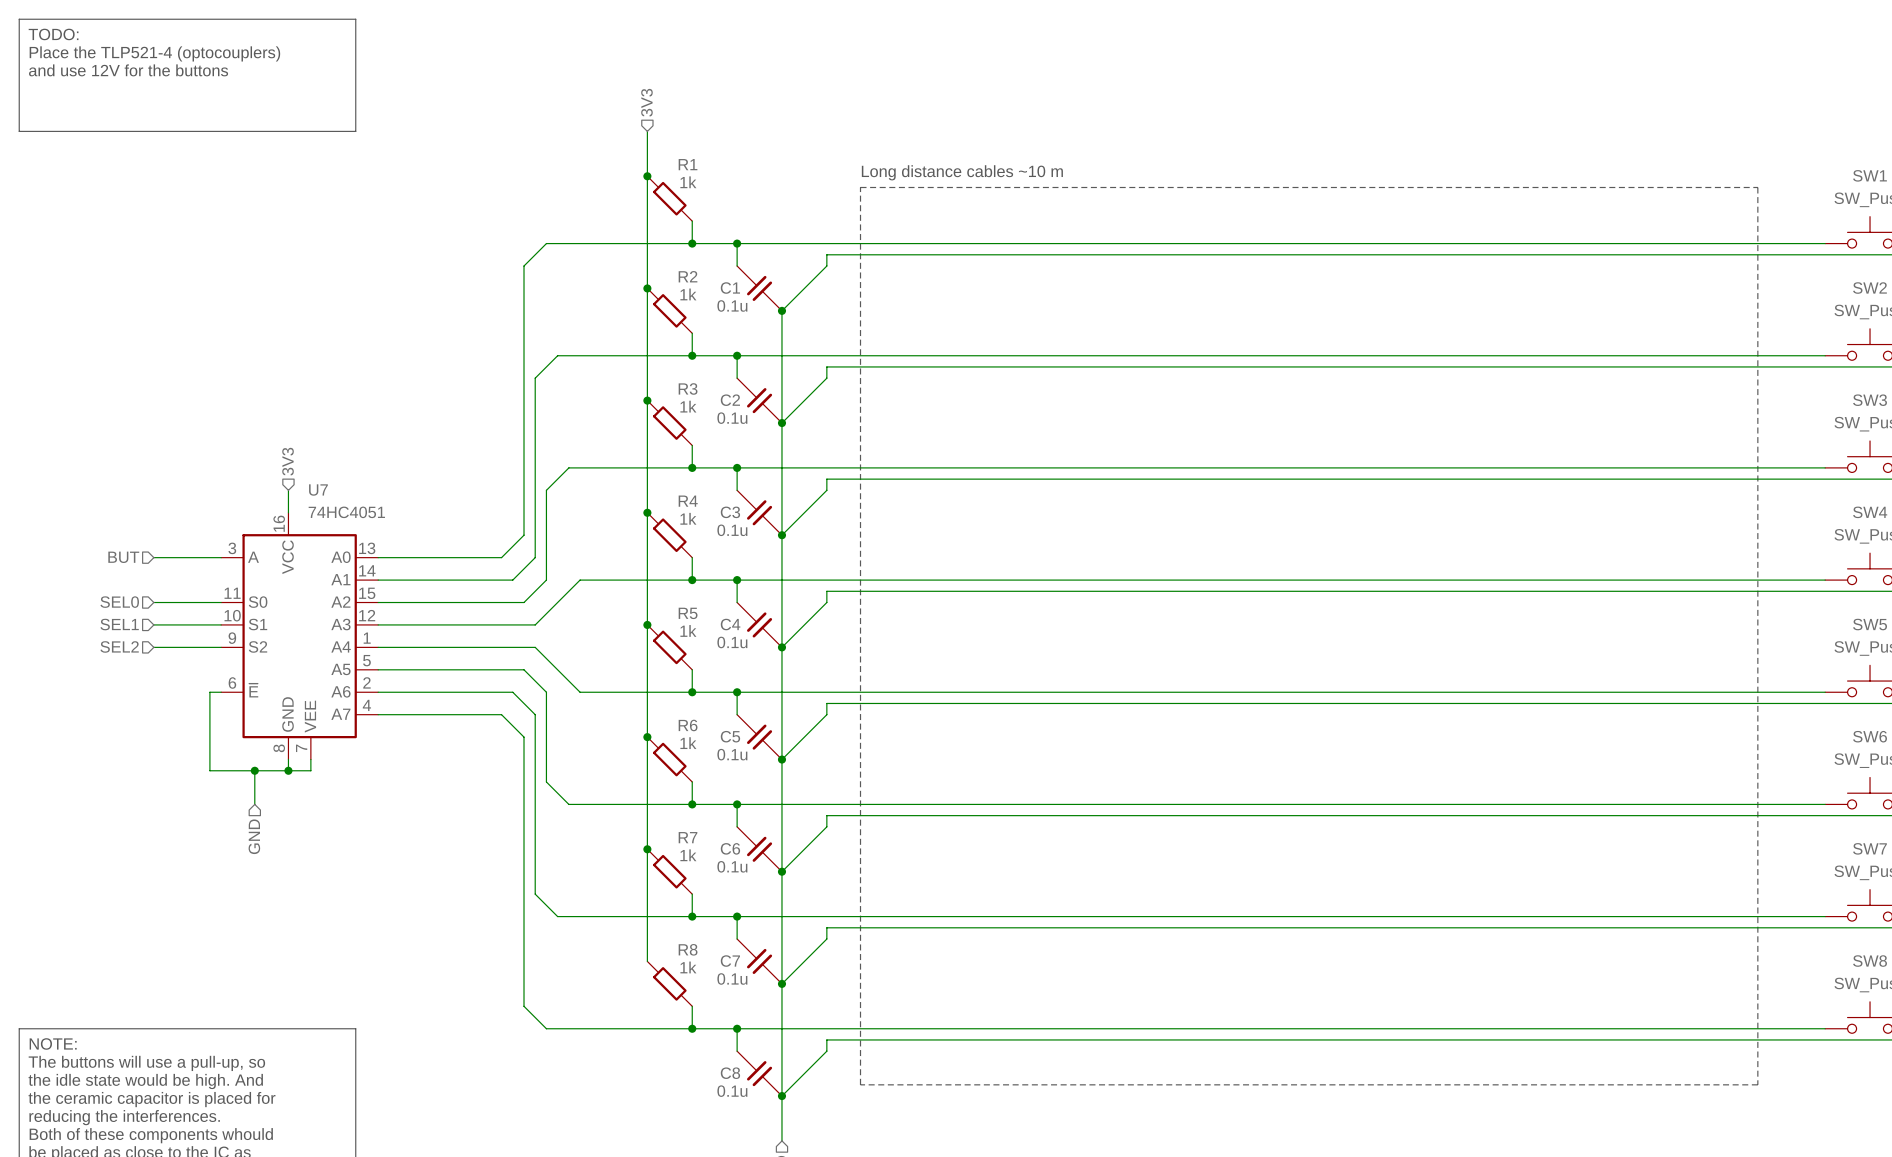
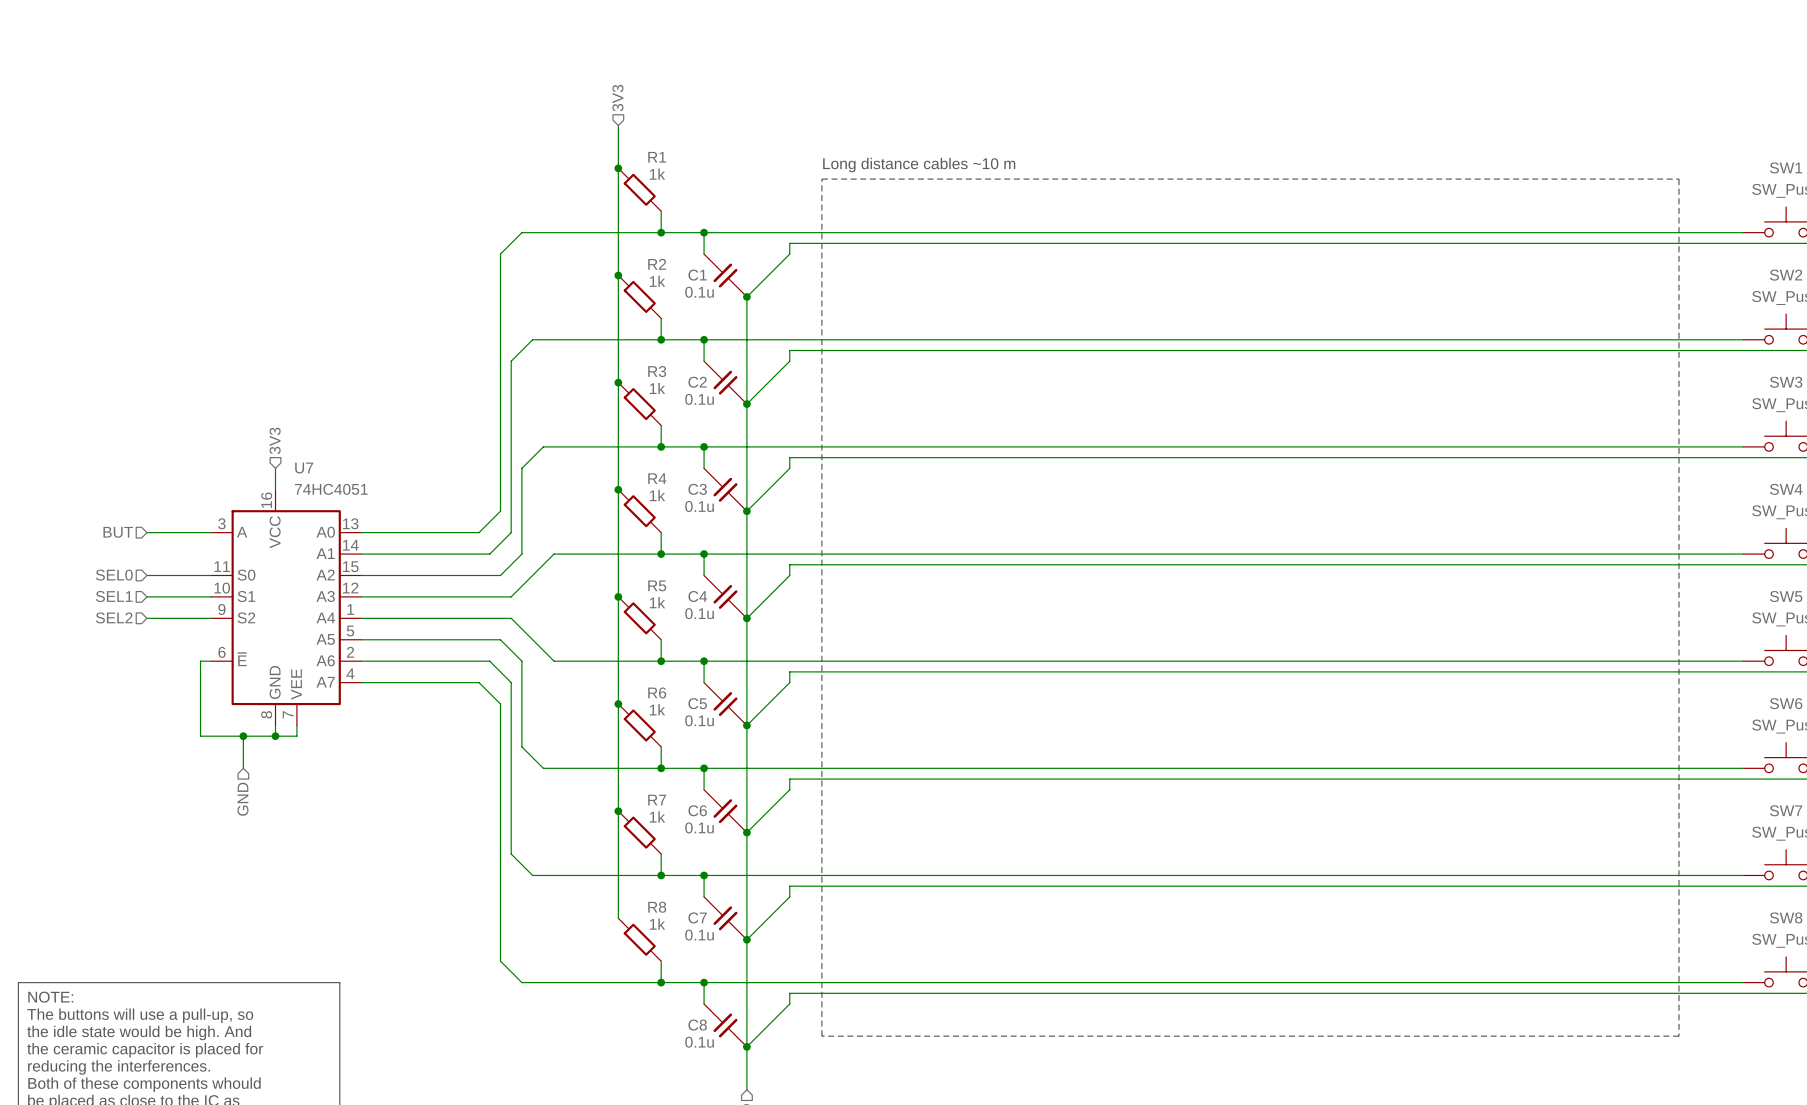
line: (19, 19) (355, 19) (355, 131) (19, 131) (19, 19) -> none
text: TODO: (53, 34) -> none
text: Place the TLP521-4 (optocouplers) (154, 53) -> none
text: and use 12V for the buttons (128, 70) -> none

